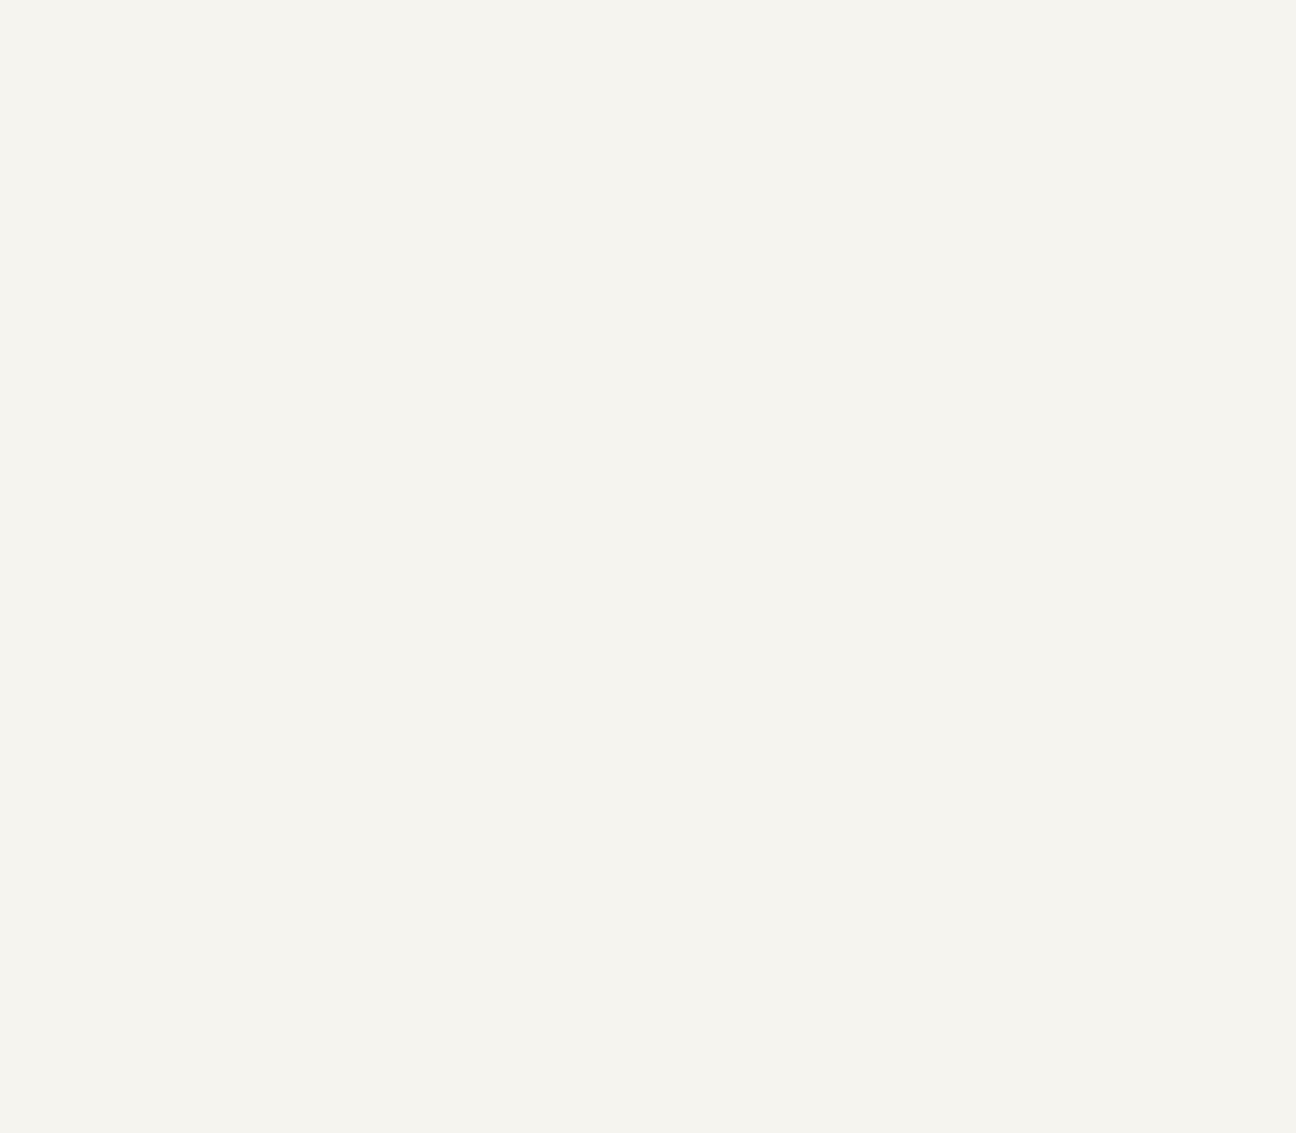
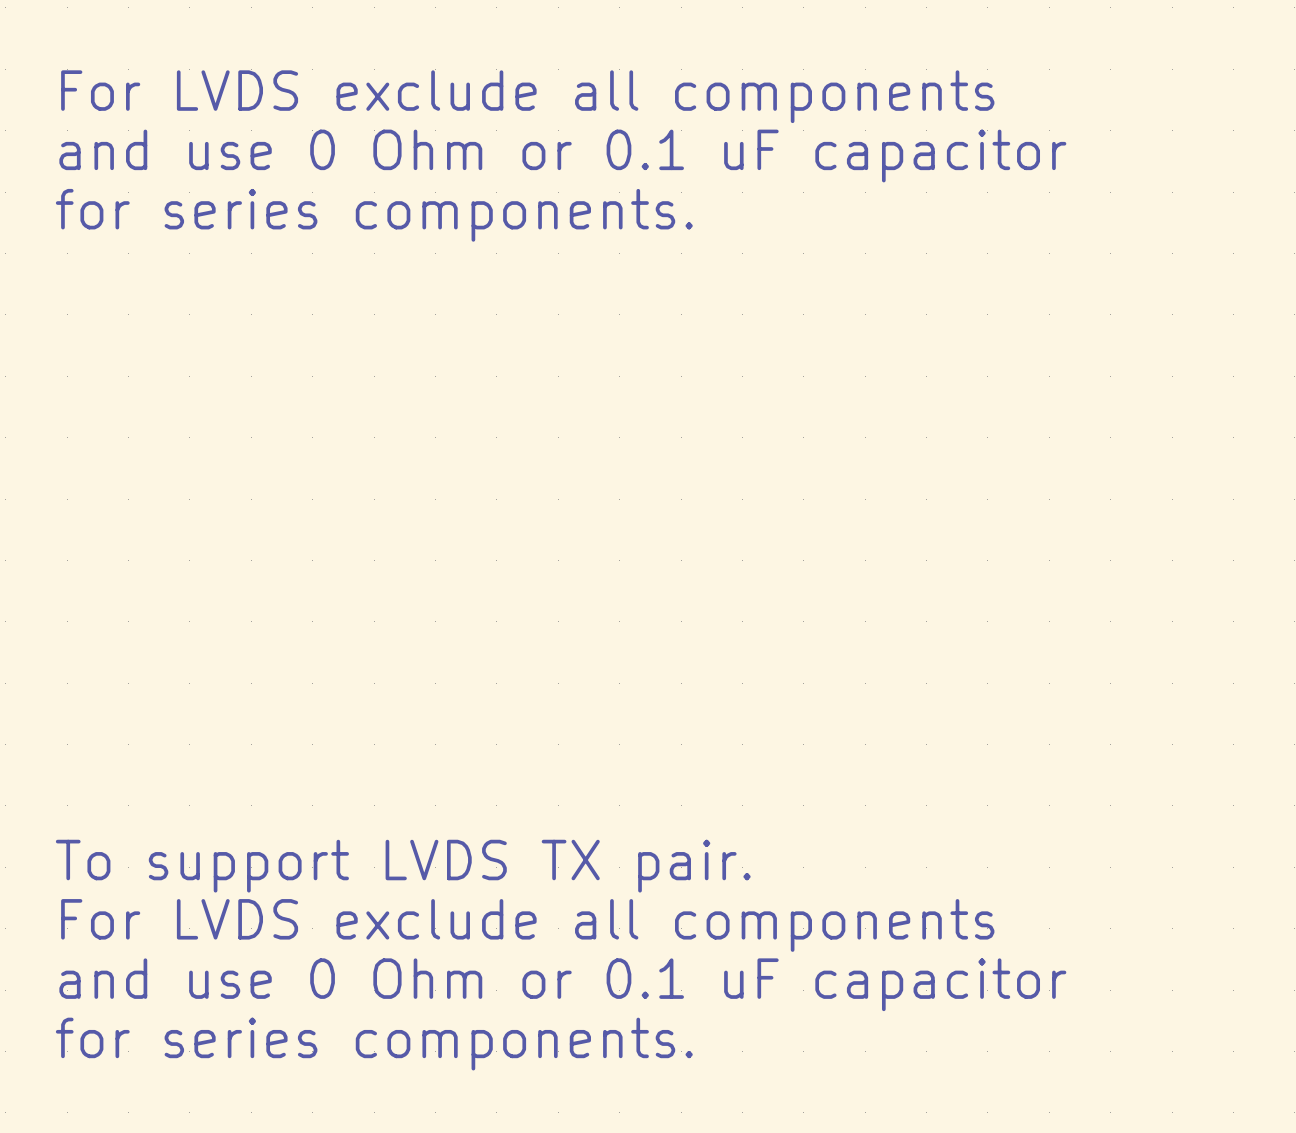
text: none -> For LVDS exclude all components (527, 96)
text: none -> and use 0 Ohm or 0.1 uF capacitor (562, 156)
text: none -> for series components. (374, 215)
text: none -> To support LVDS TX pair. (403, 866)
text: none -> For LVDS exclude all components (527, 925)
text: none -> and use 0 Ohm or 0.1 uF capacitor (562, 984)
text: none -> for series components. (374, 1044)

